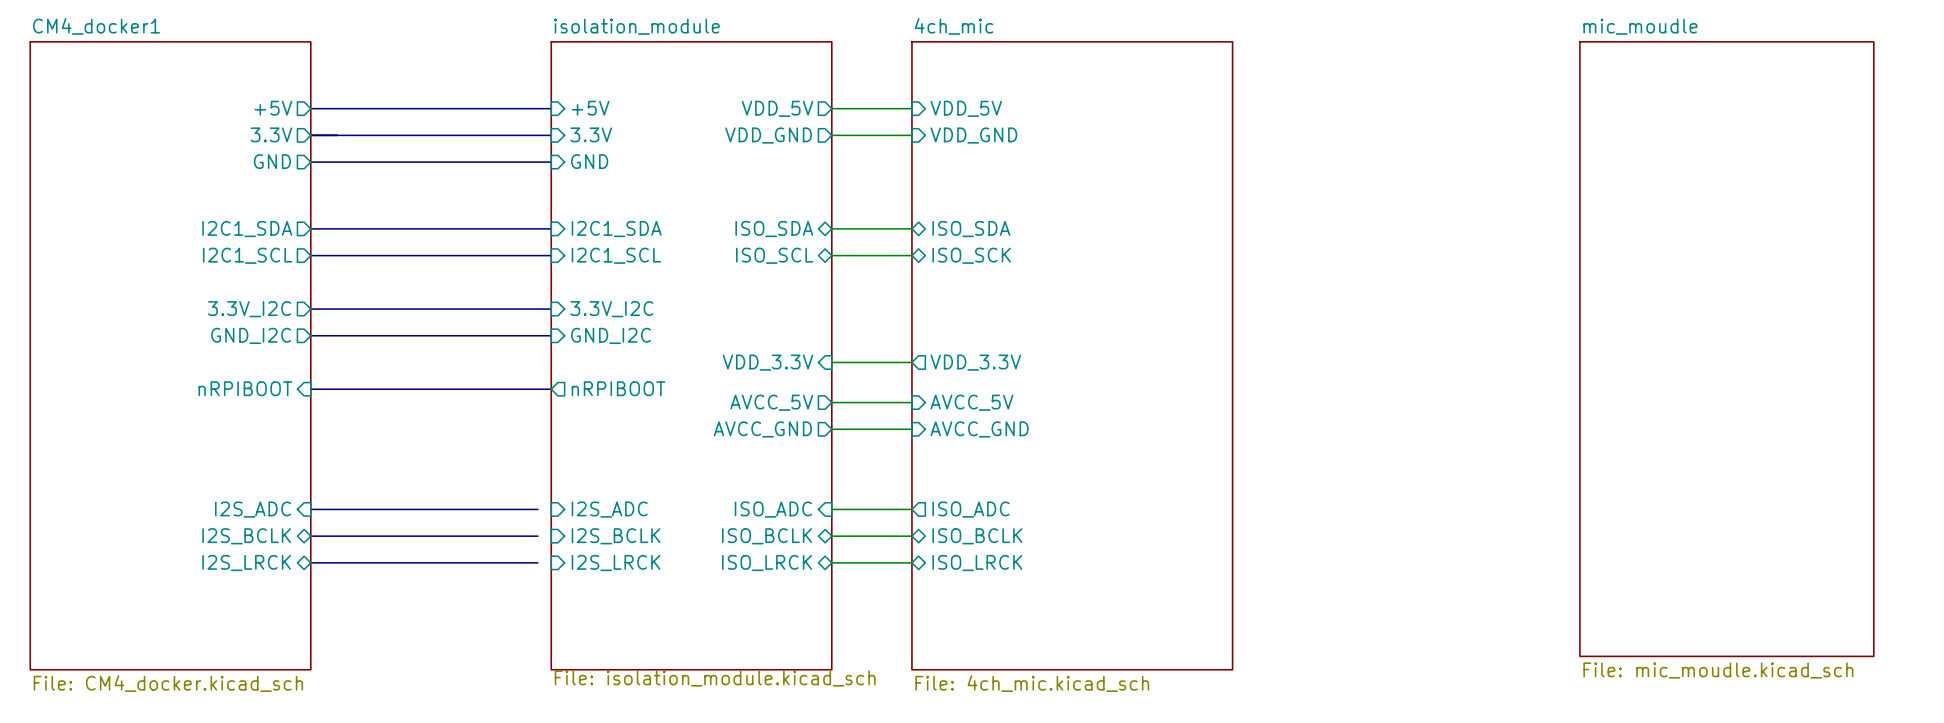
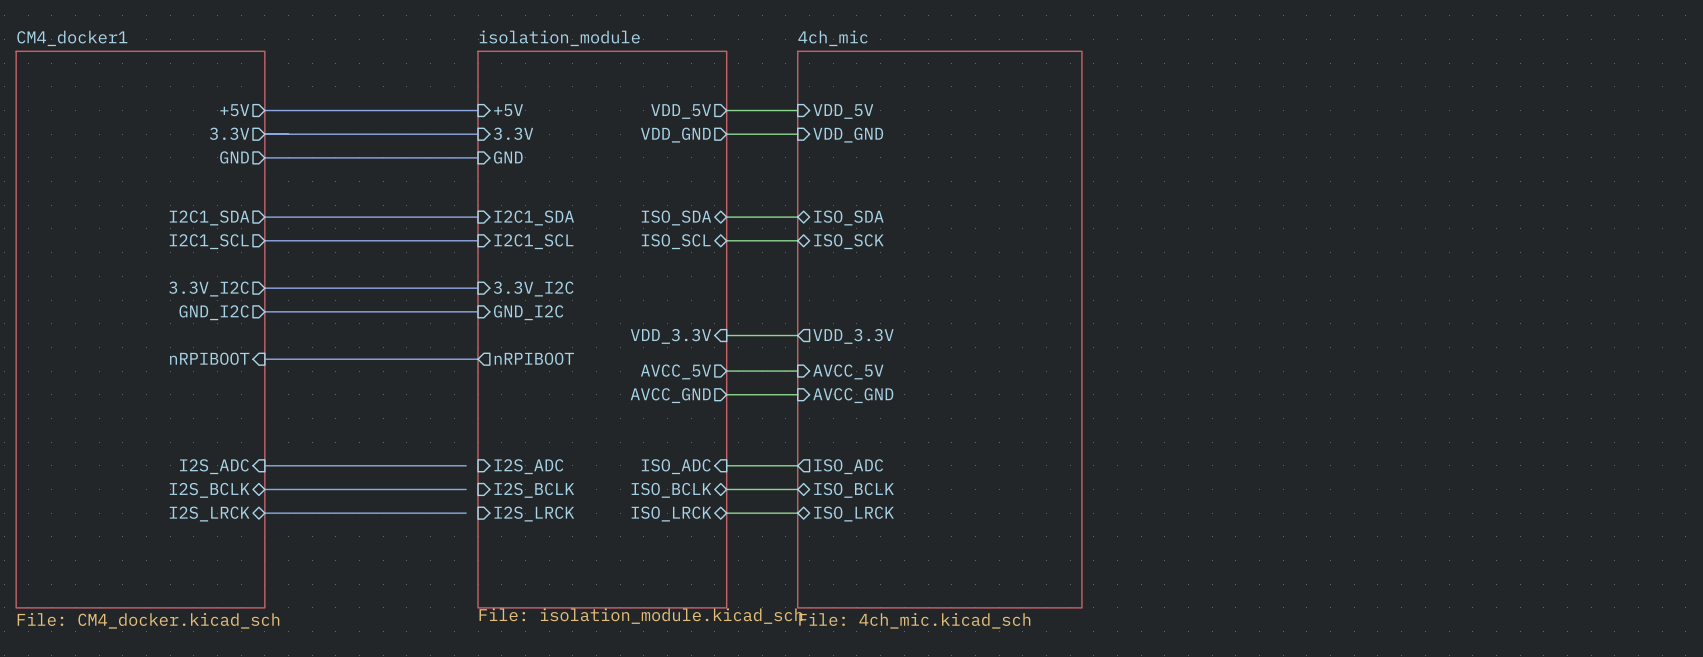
sheet mic_moudle: File: mic_moudle.kicad_sch (1726, 349) -> none

